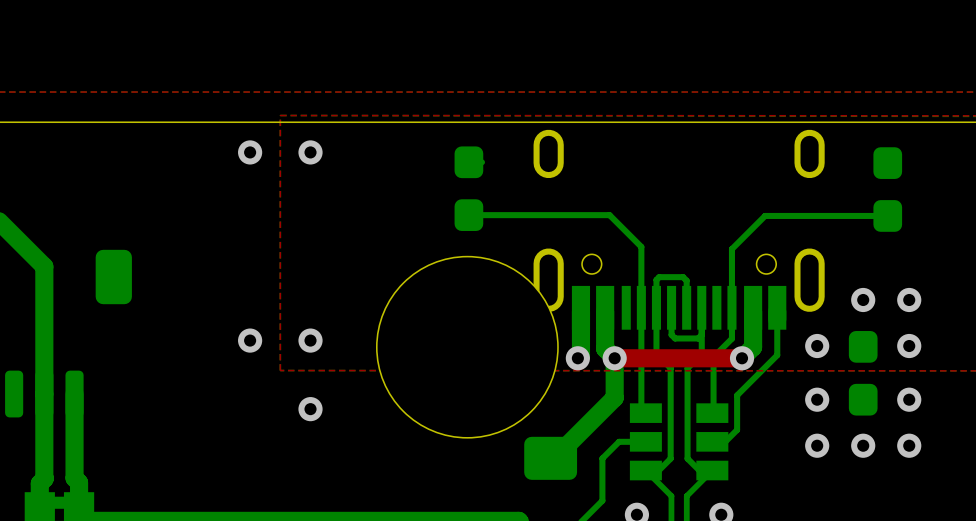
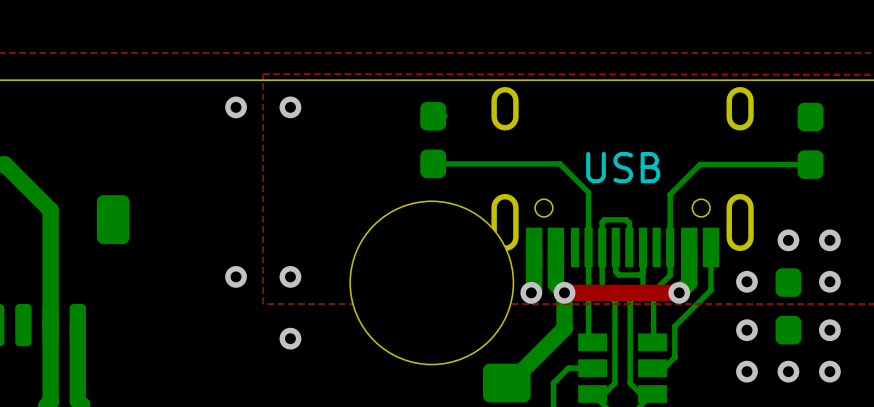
text: none -> USB (623, 167)

